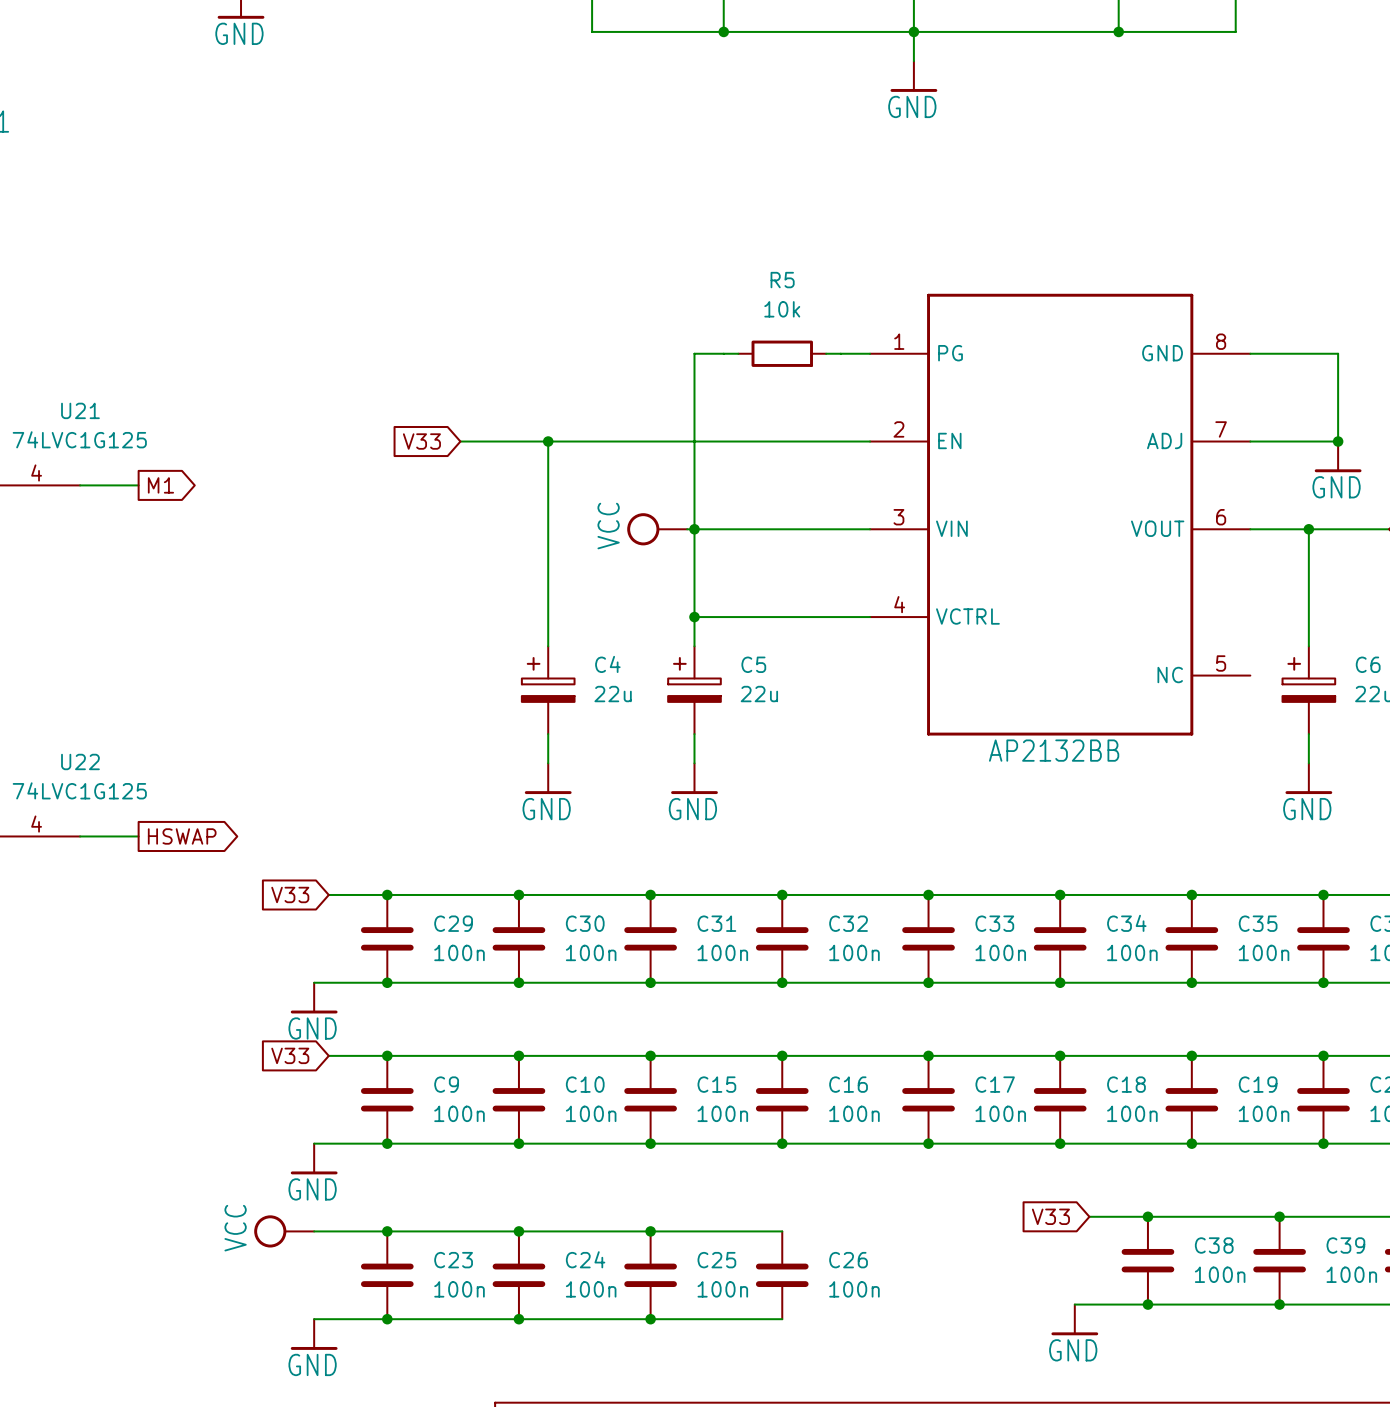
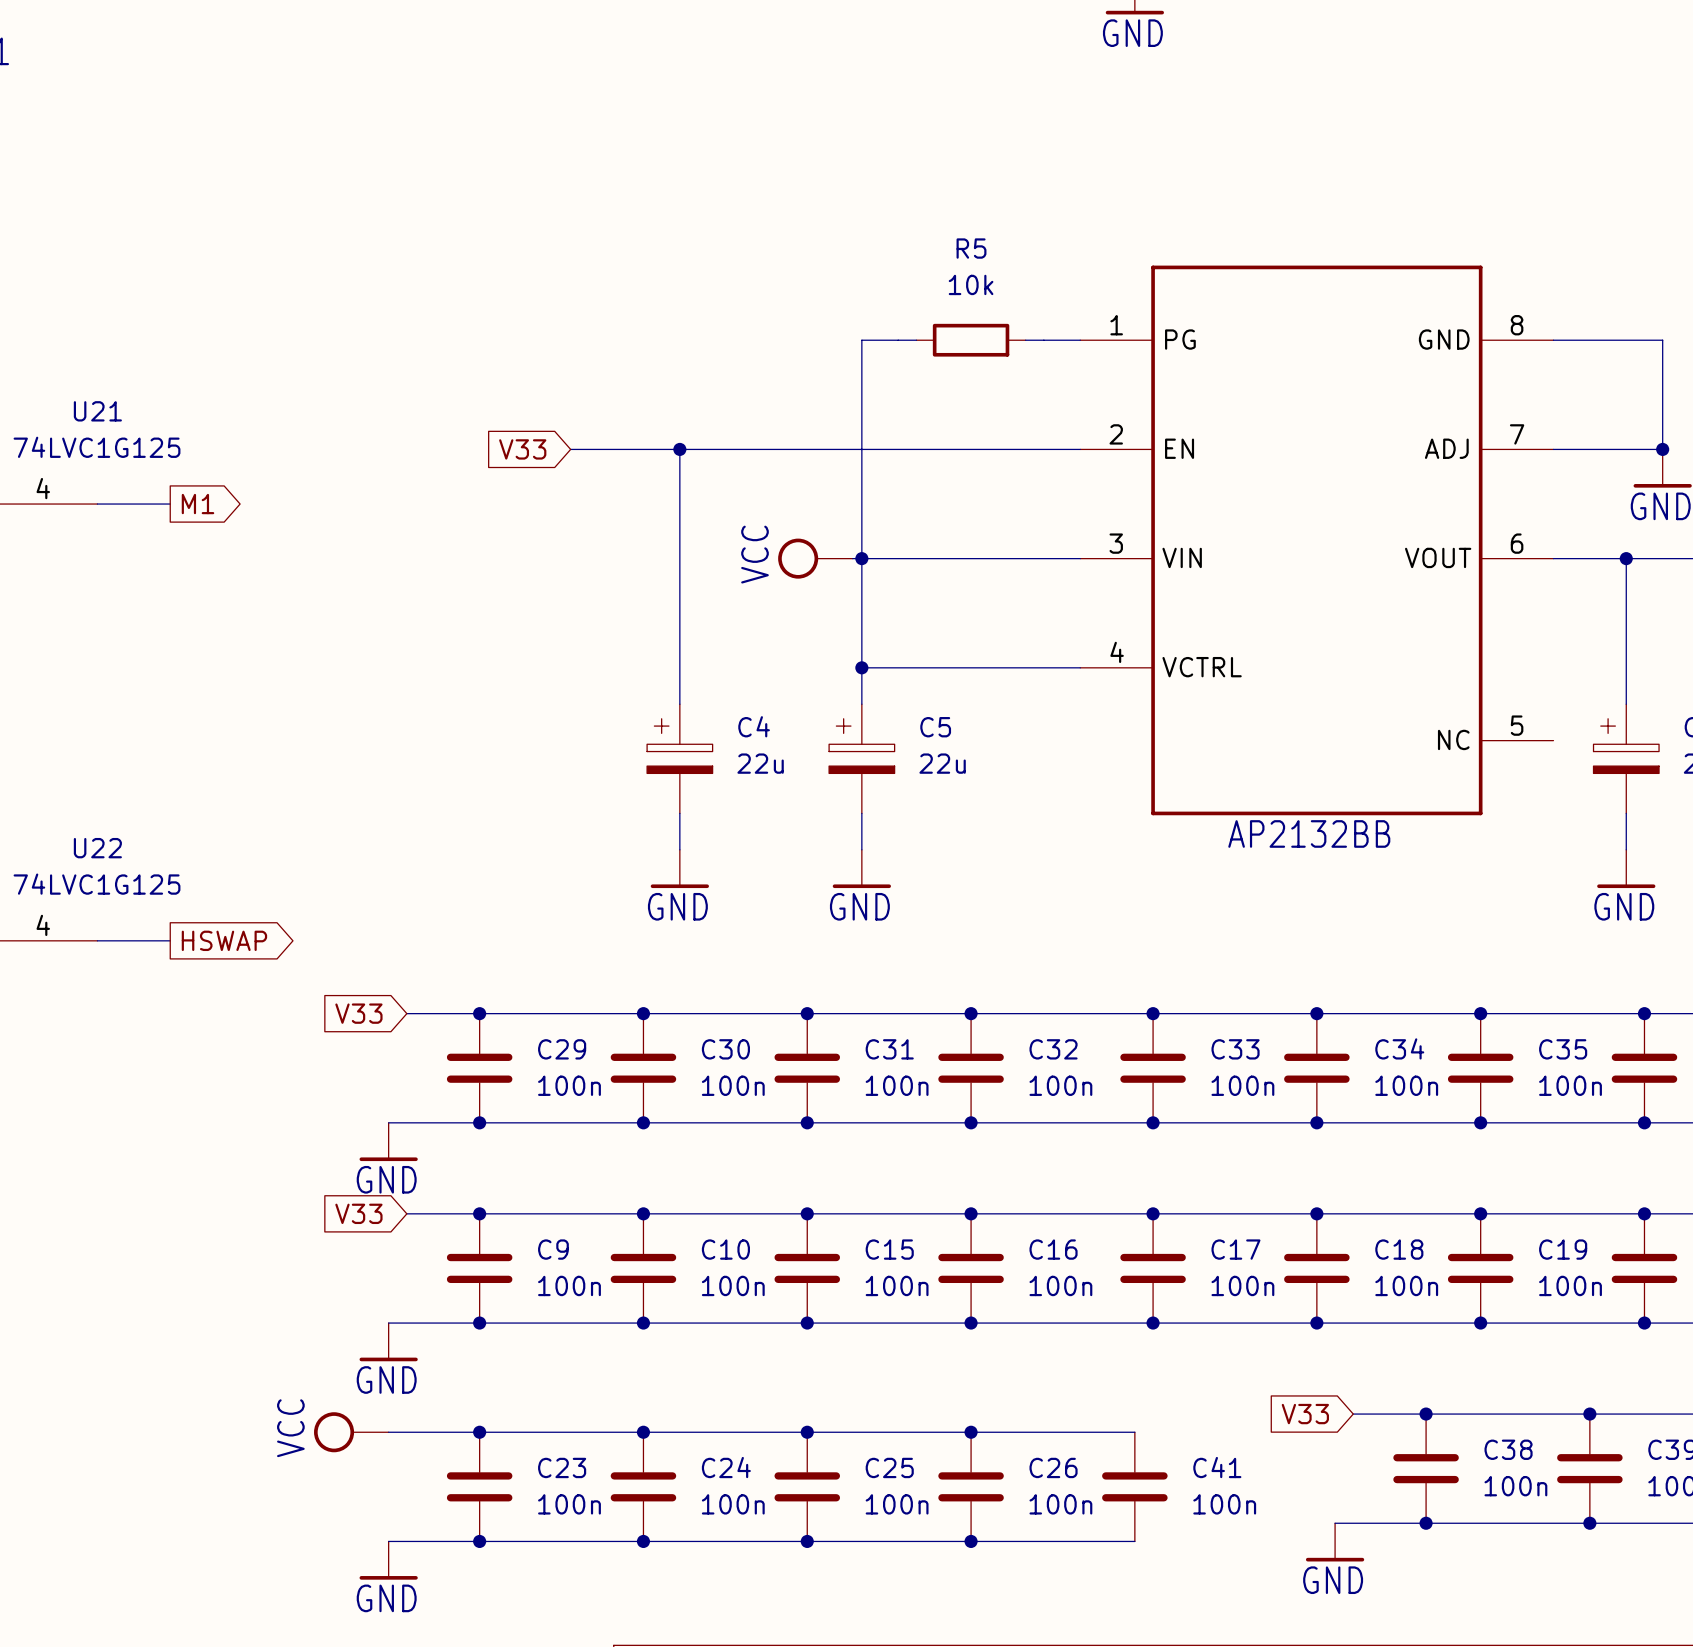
wire: none -> (971, 1432) (1134, 1432)
junction: none -> (971, 1432)
C41: none -> 100n (1134, 1486)
wire: none -> (971, 1541) (1134, 1541)
junction: none -> (971, 1541)

